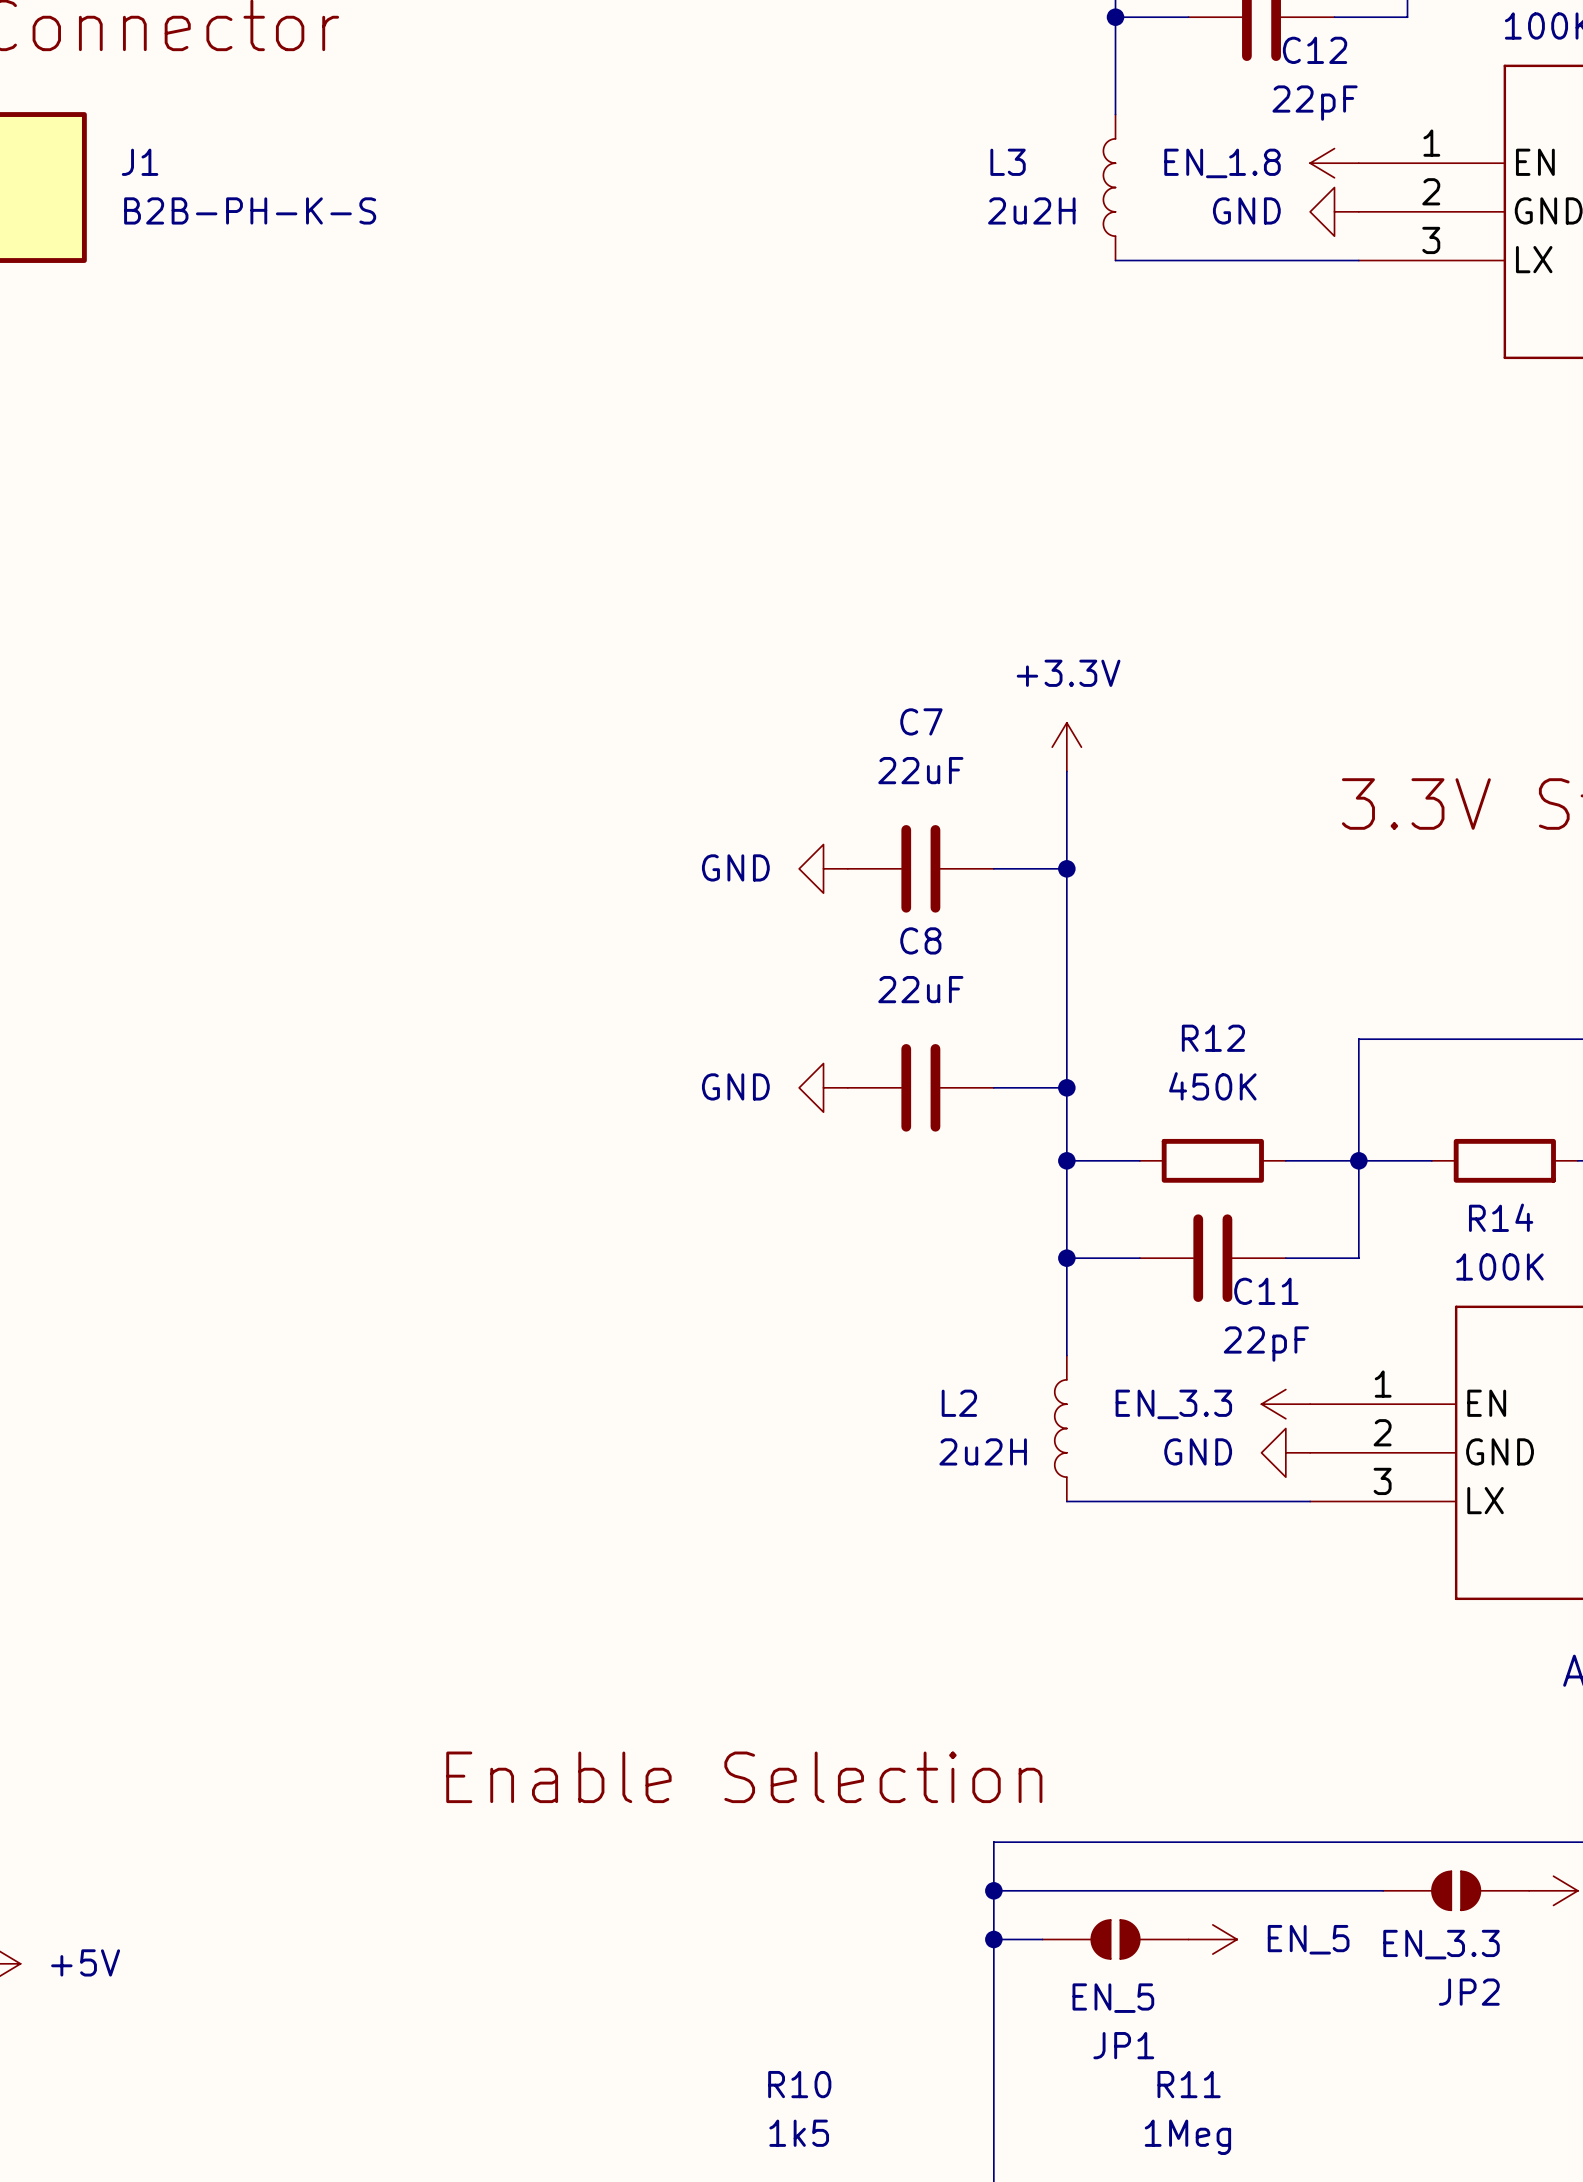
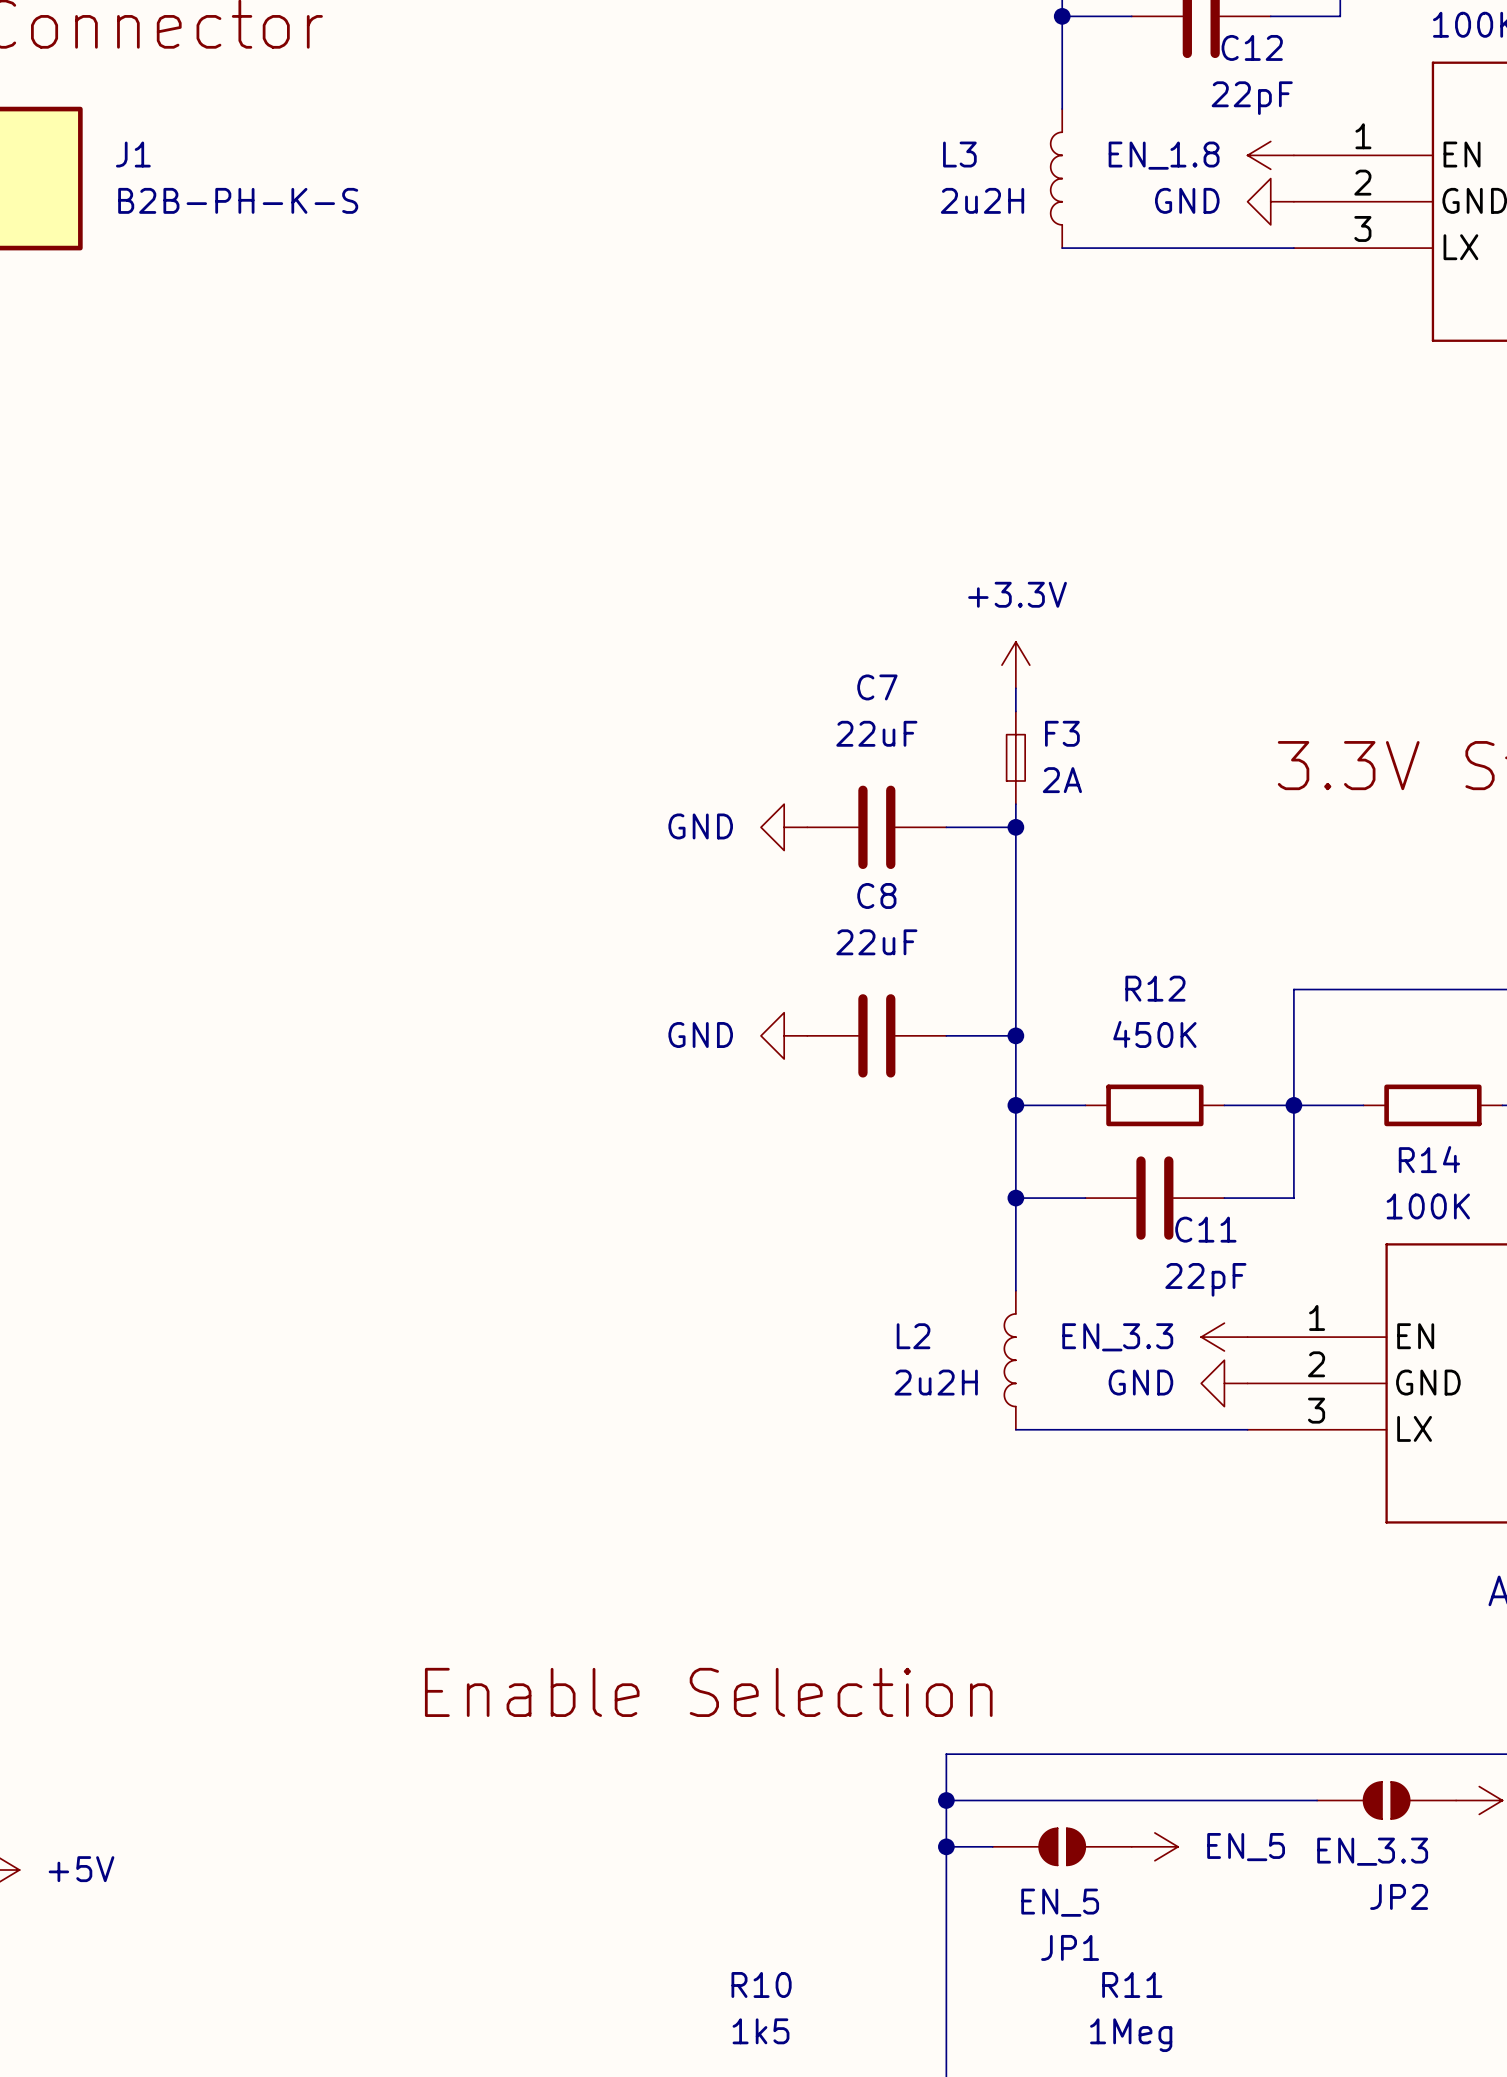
power symbol position: +3.3V (1066, 747) -> +3.3V (1015, 665)
F3: none -> 2A (1015, 757)

